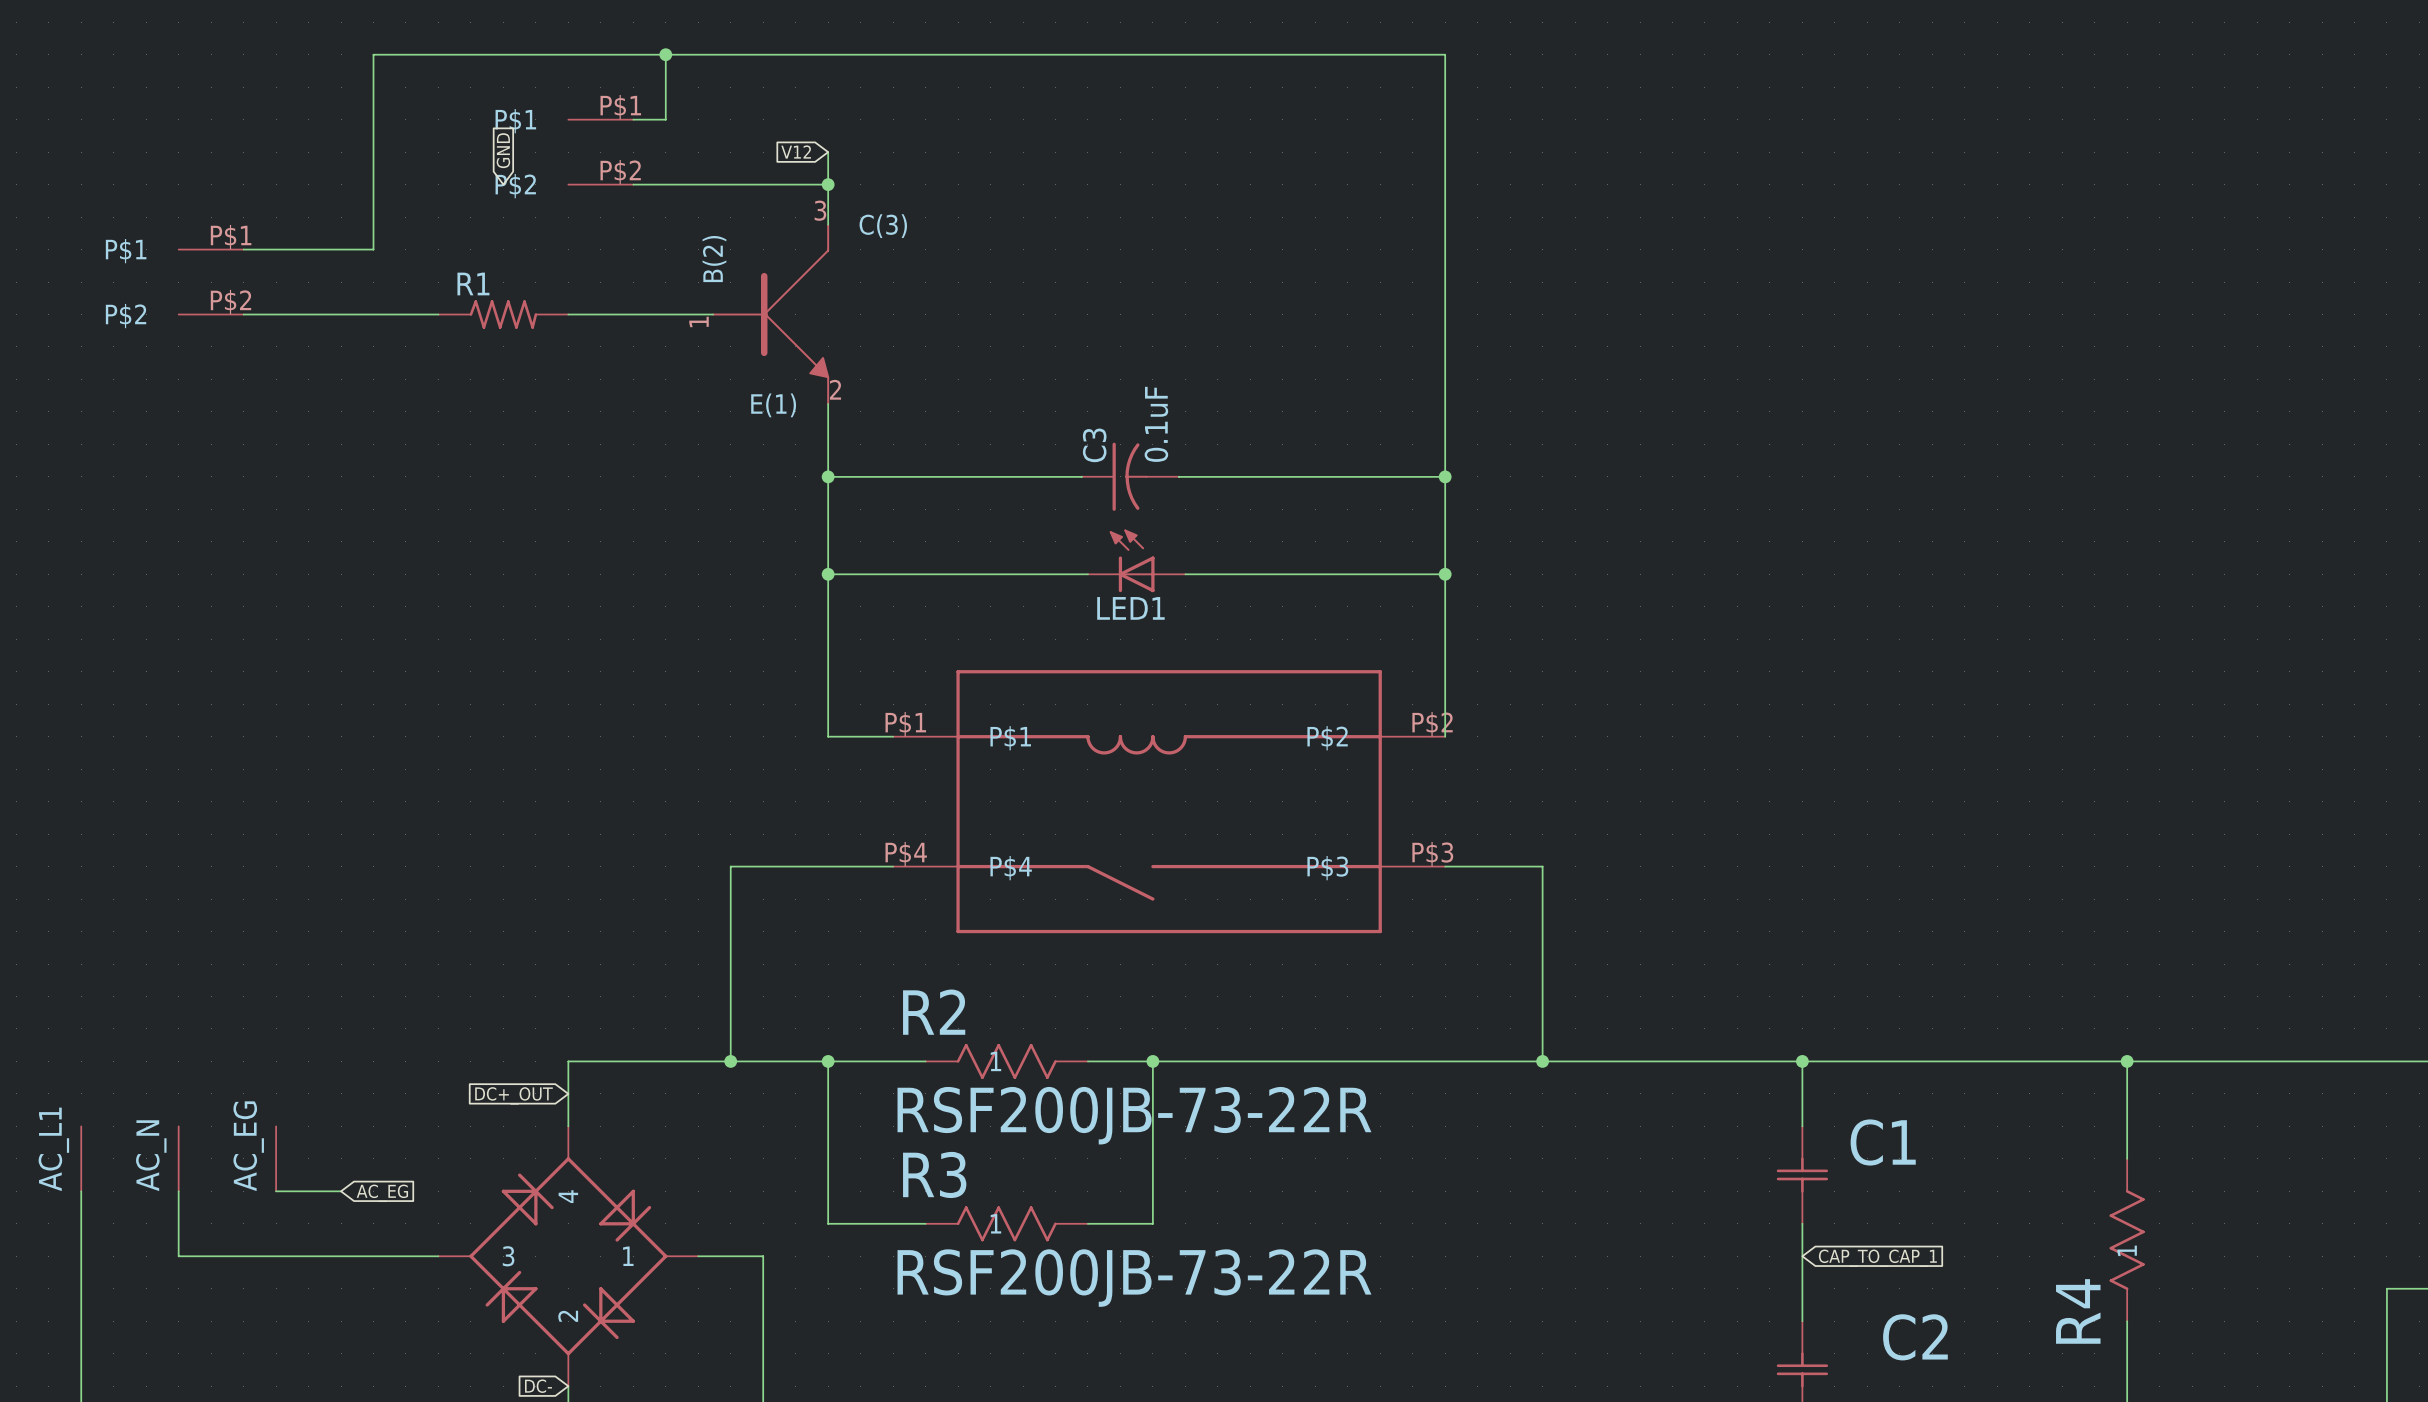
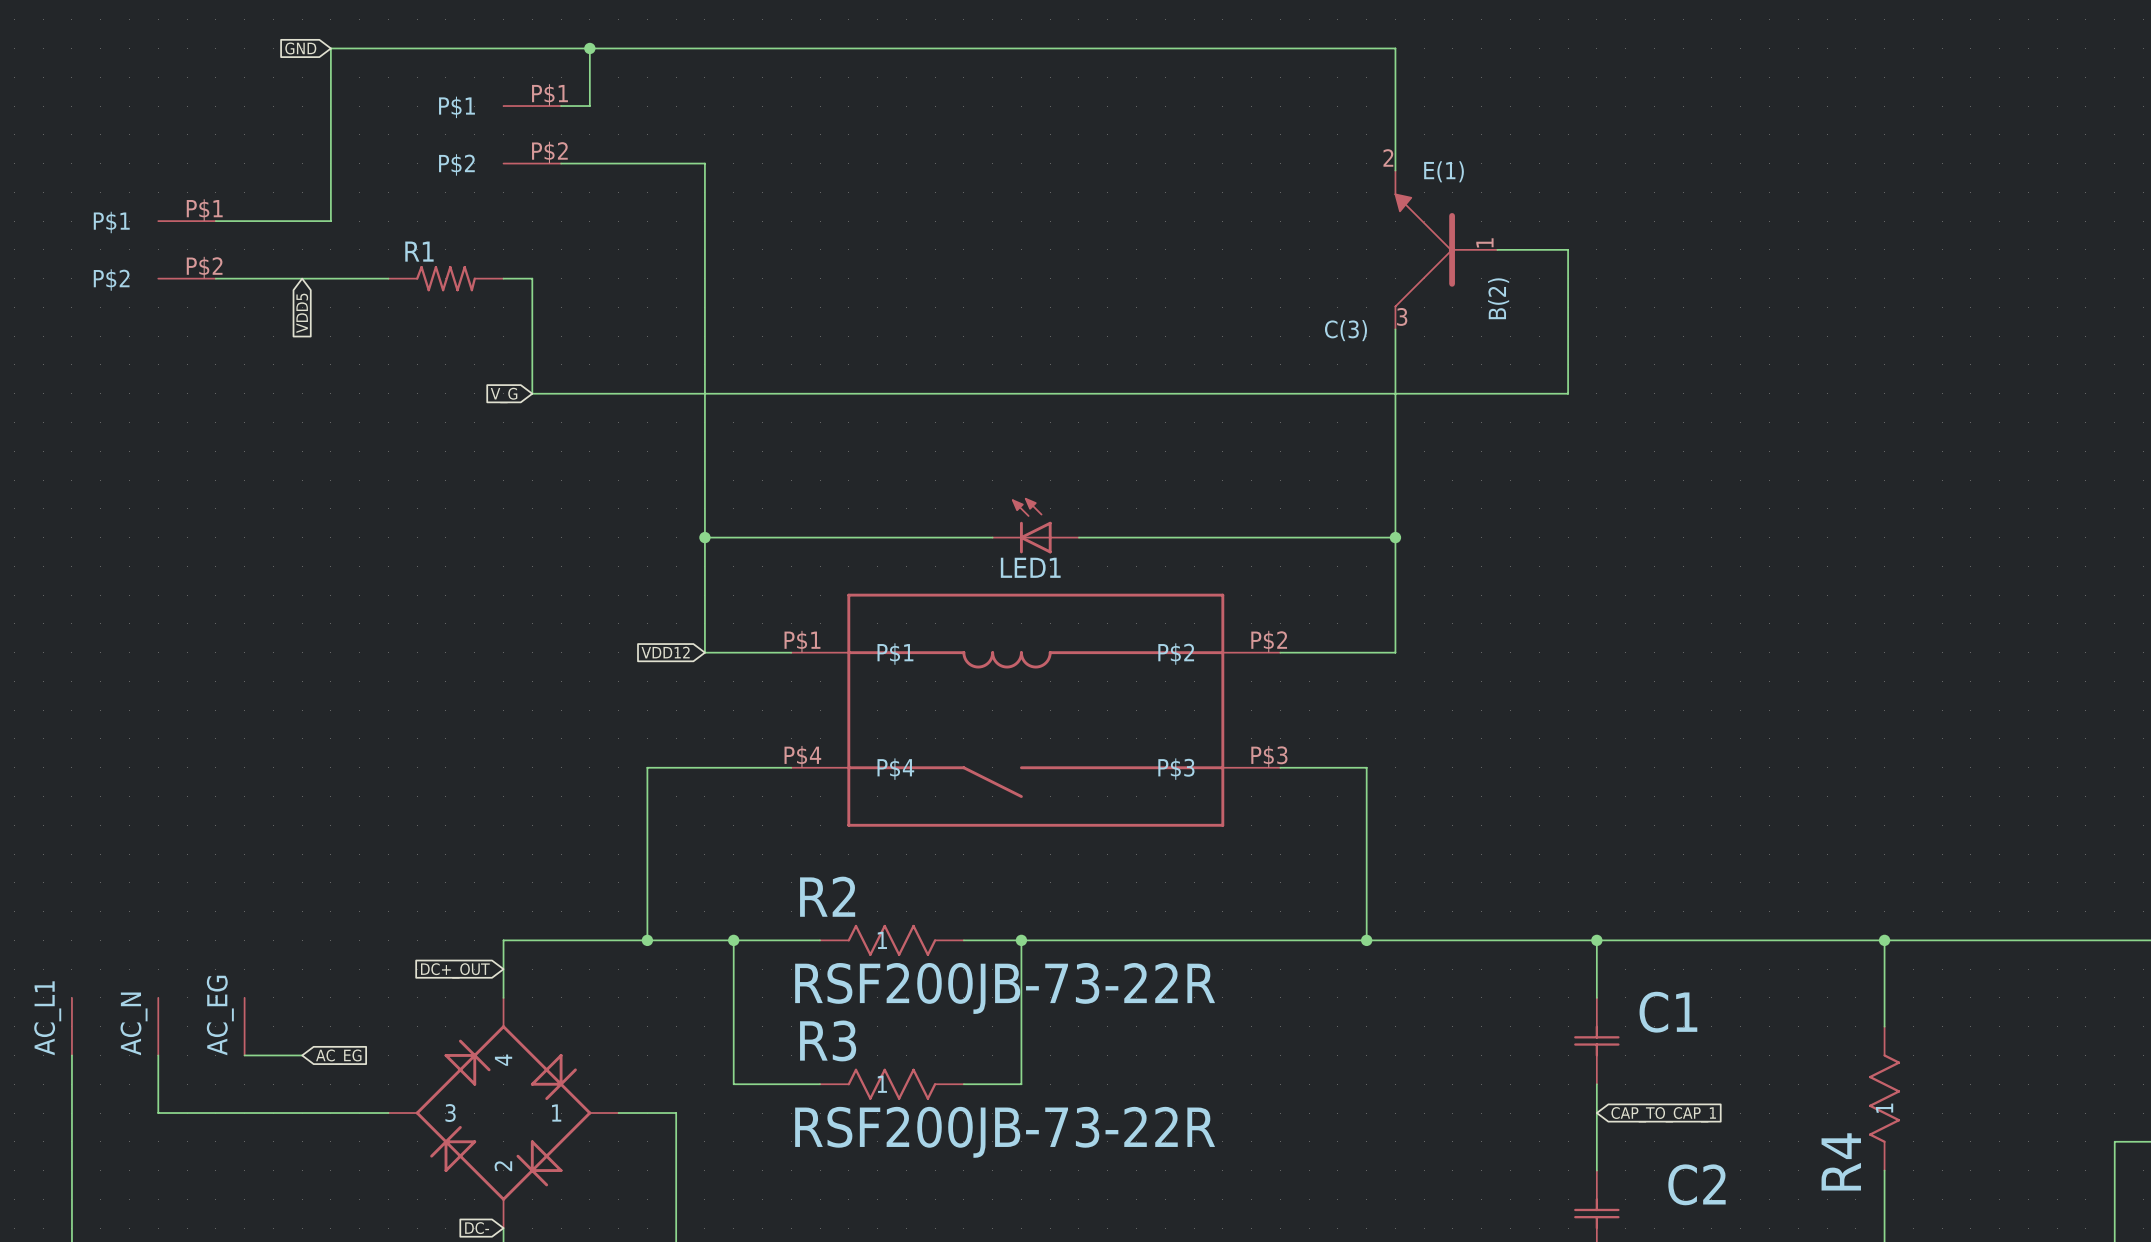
wire: (1445, 54) (1445, 736) -> (1395, 329) (1395, 652) (1280, 652)
wire: none -> (1280, 48) (1395, 48) (1395, 170)
global label rotation: 0° (503, 150) -> 90° counterclockwise (300, 48)
global label position: GND (503, 150) -> GND (300, 48)
global label: V12 (796, 152) -> none
wire: (828, 152) (828, 224) -> none
wire: (795, 184) (828, 184) -> none
junction: (828, 184) -> none
part: none -> (1446, 249)
wire: (600, 314) (713, 314) -> (532, 278) (532, 393) (1568, 393) (1568, 249) (1497, 249)
part: (770, 314) -> none
global label: none -> VDD5 (302, 313)
wire: (828, 404) (828, 736) -> (704, 163) (704, 652) (733, 652)
global label: none -> V_G (504, 395)
wire: (828, 476) (1081, 476) -> none
junction: (828, 476) -> none
C3: (1130, 476) -> none
wire: (1179, 476) (1445, 476) -> none
junction: (1445, 476) -> none
LED1 position: (1136, 560) -> (1035, 525)
wire: (828, 574) (1087, 574) -> none
junction position: (828, 574) -> (704, 537)
wire: (1185, 574) (1445, 574) -> none
junction: (1445, 574) -> none
wire: none -> (704, 537) (992, 537)
wire: none -> (1078, 537) (1395, 537)
junction: none -> (1395, 537)
global label: none -> VDD12 (665, 652)

